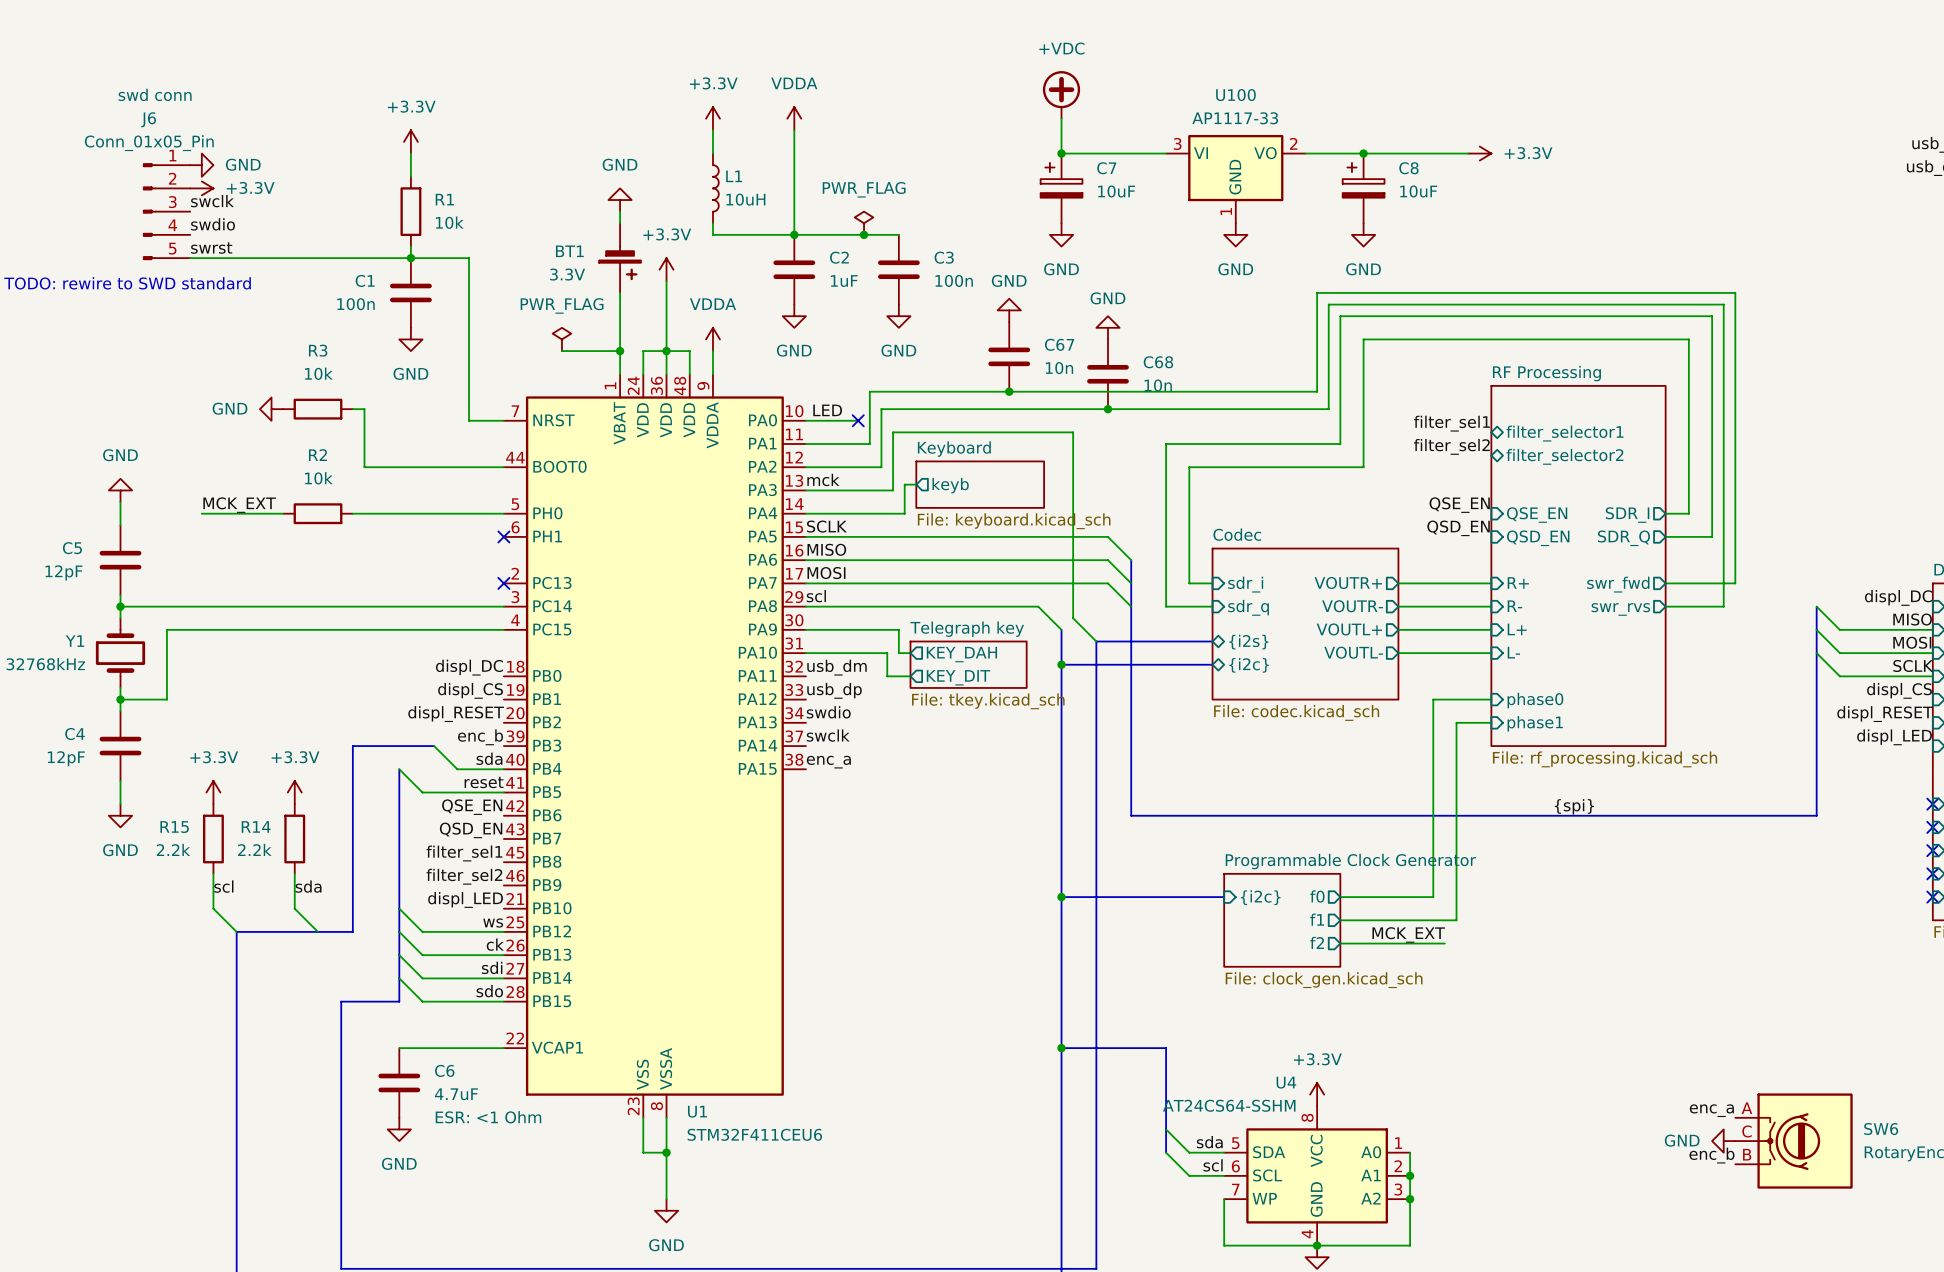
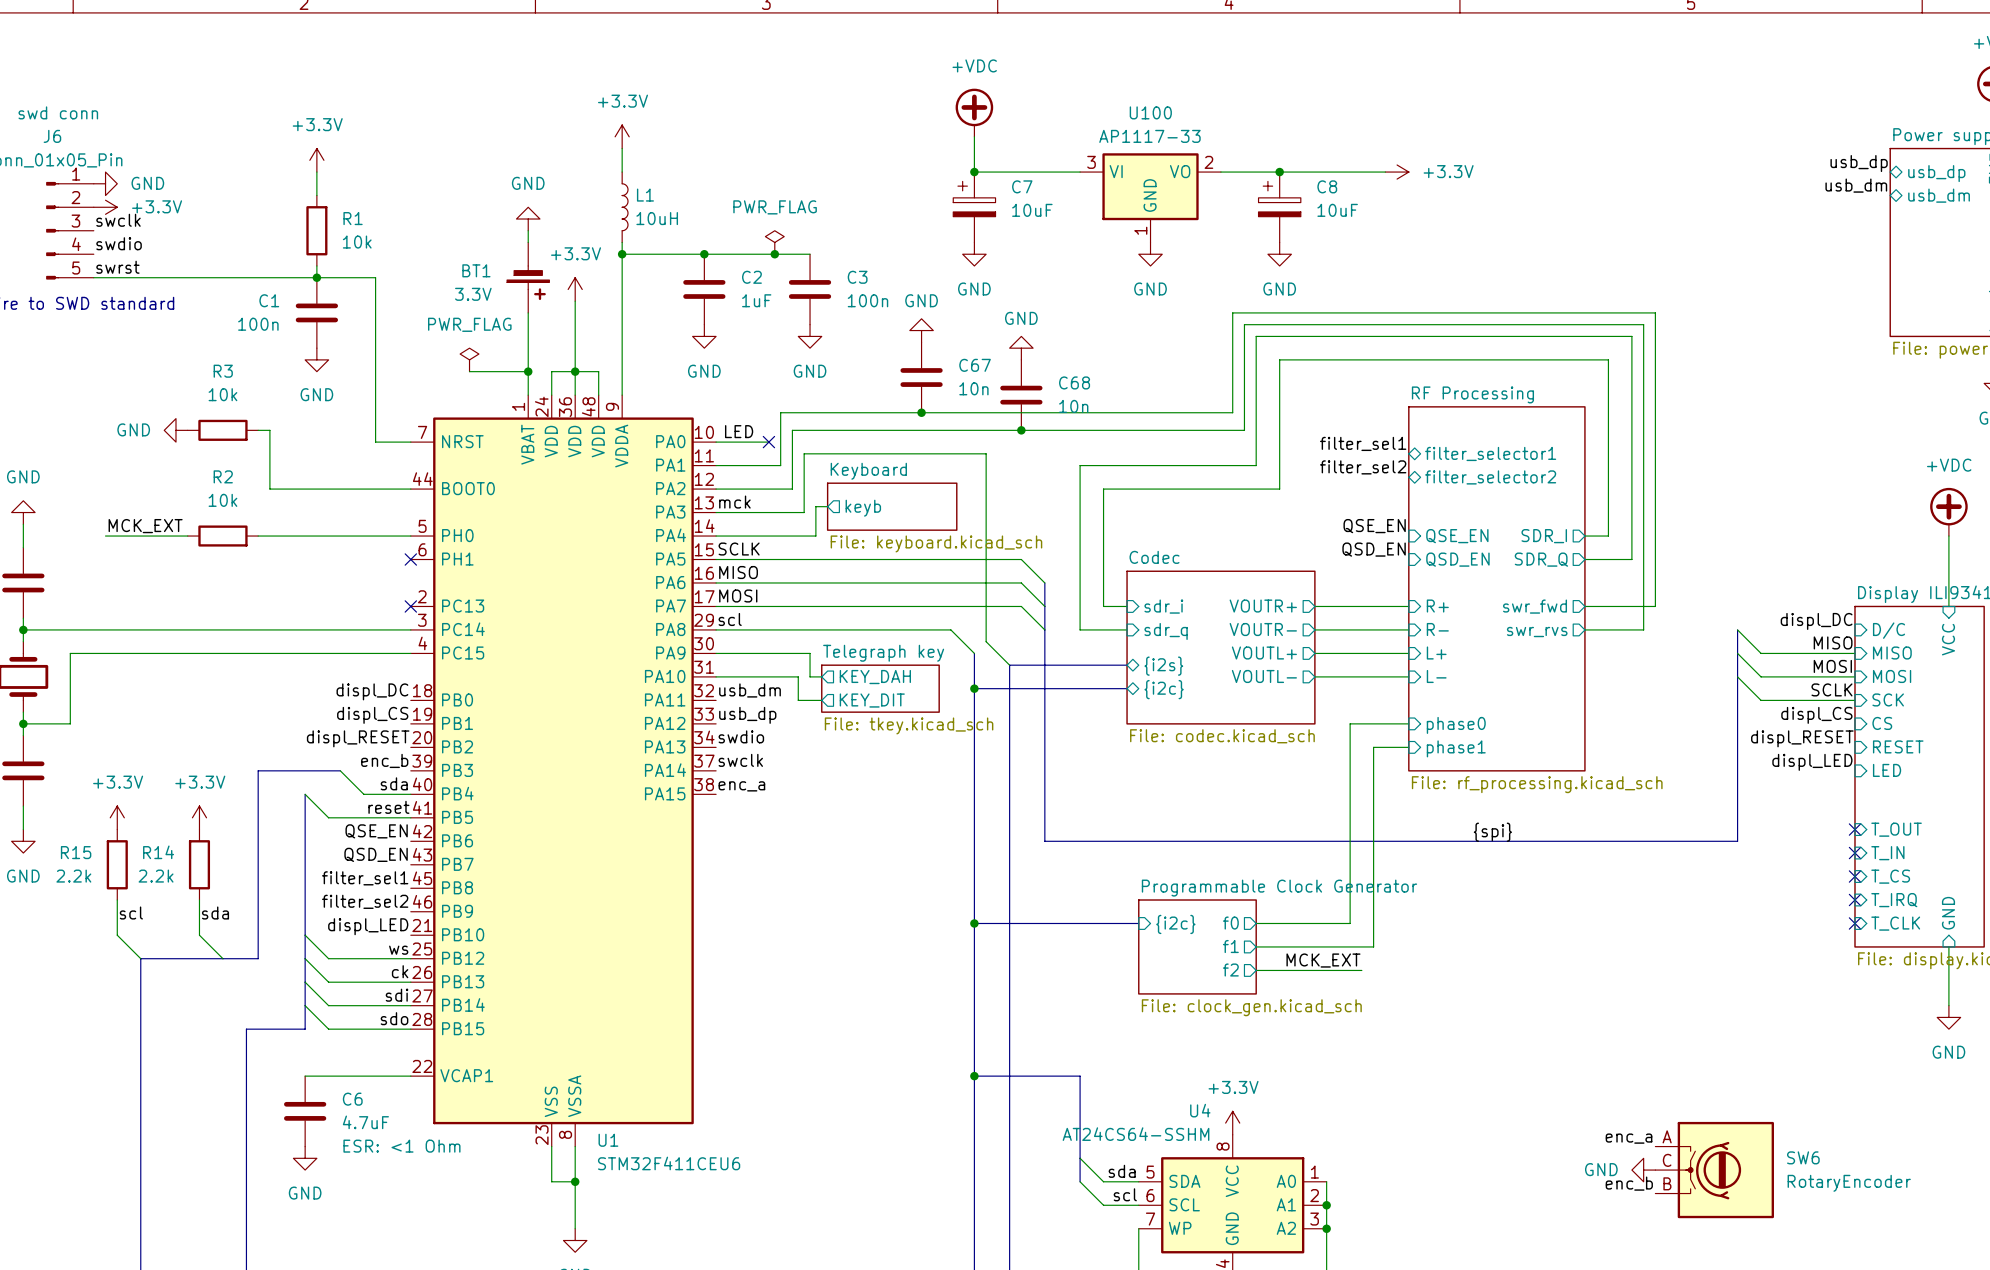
power symbol: VDDA (794, 118) -> none
wire: (794, 130) (794, 234) -> none
wire: none -> (622, 254) (622, 371)
junction: none -> (622, 254)
power symbol: VDDA (712, 339) -> none

